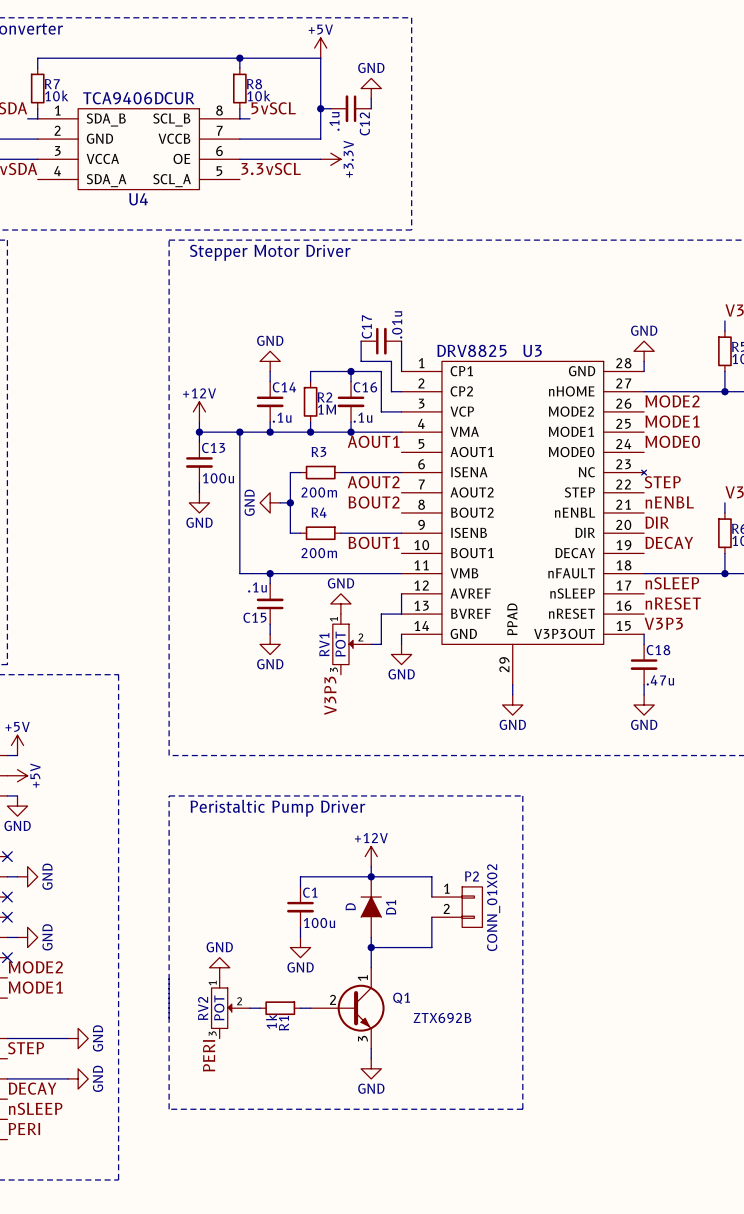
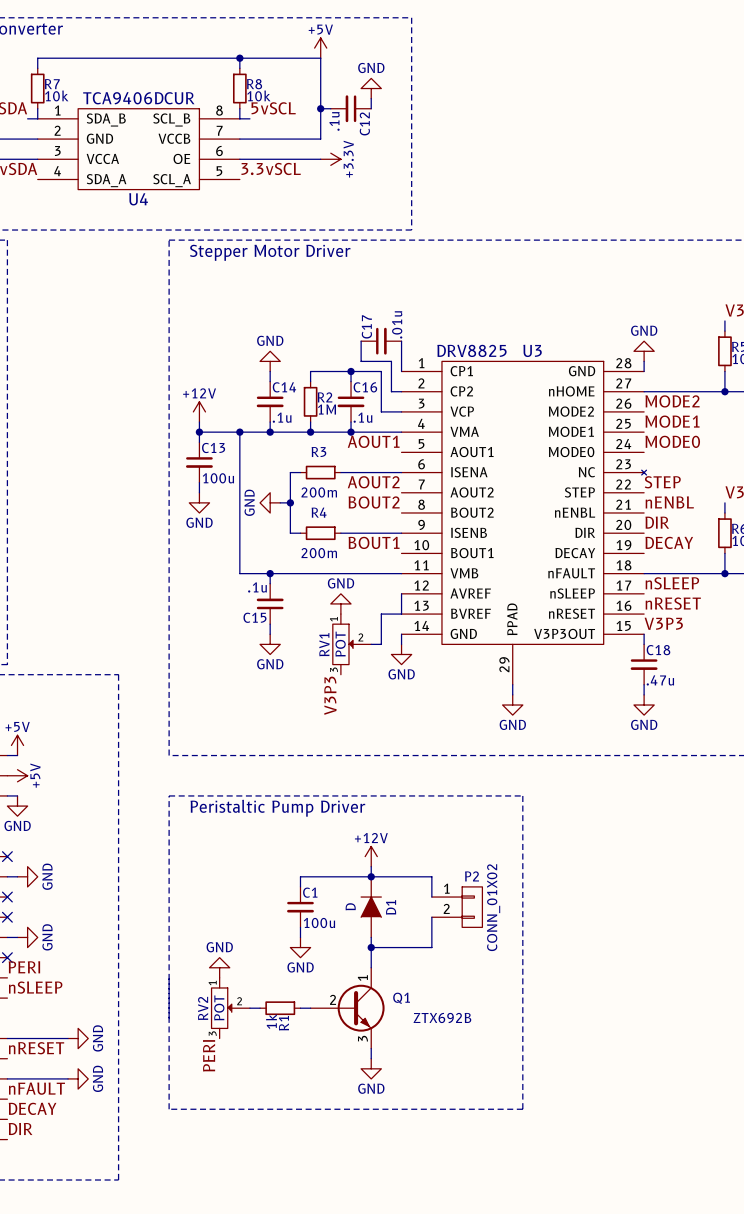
label: MODE2 (35, 967) -> PERI (24, 967)
label: MODE1 (35, 987) -> nSLEEP (35, 987)
label: STEP (26, 1048) -> nRESET (36, 1048)
label: DECAY (32, 1088) -> nFAULT (36, 1088)
label: nSLEEP (35, 1108) -> DECAY (32, 1108)
label: PERI (24, 1129) -> DIR (20, 1129)

